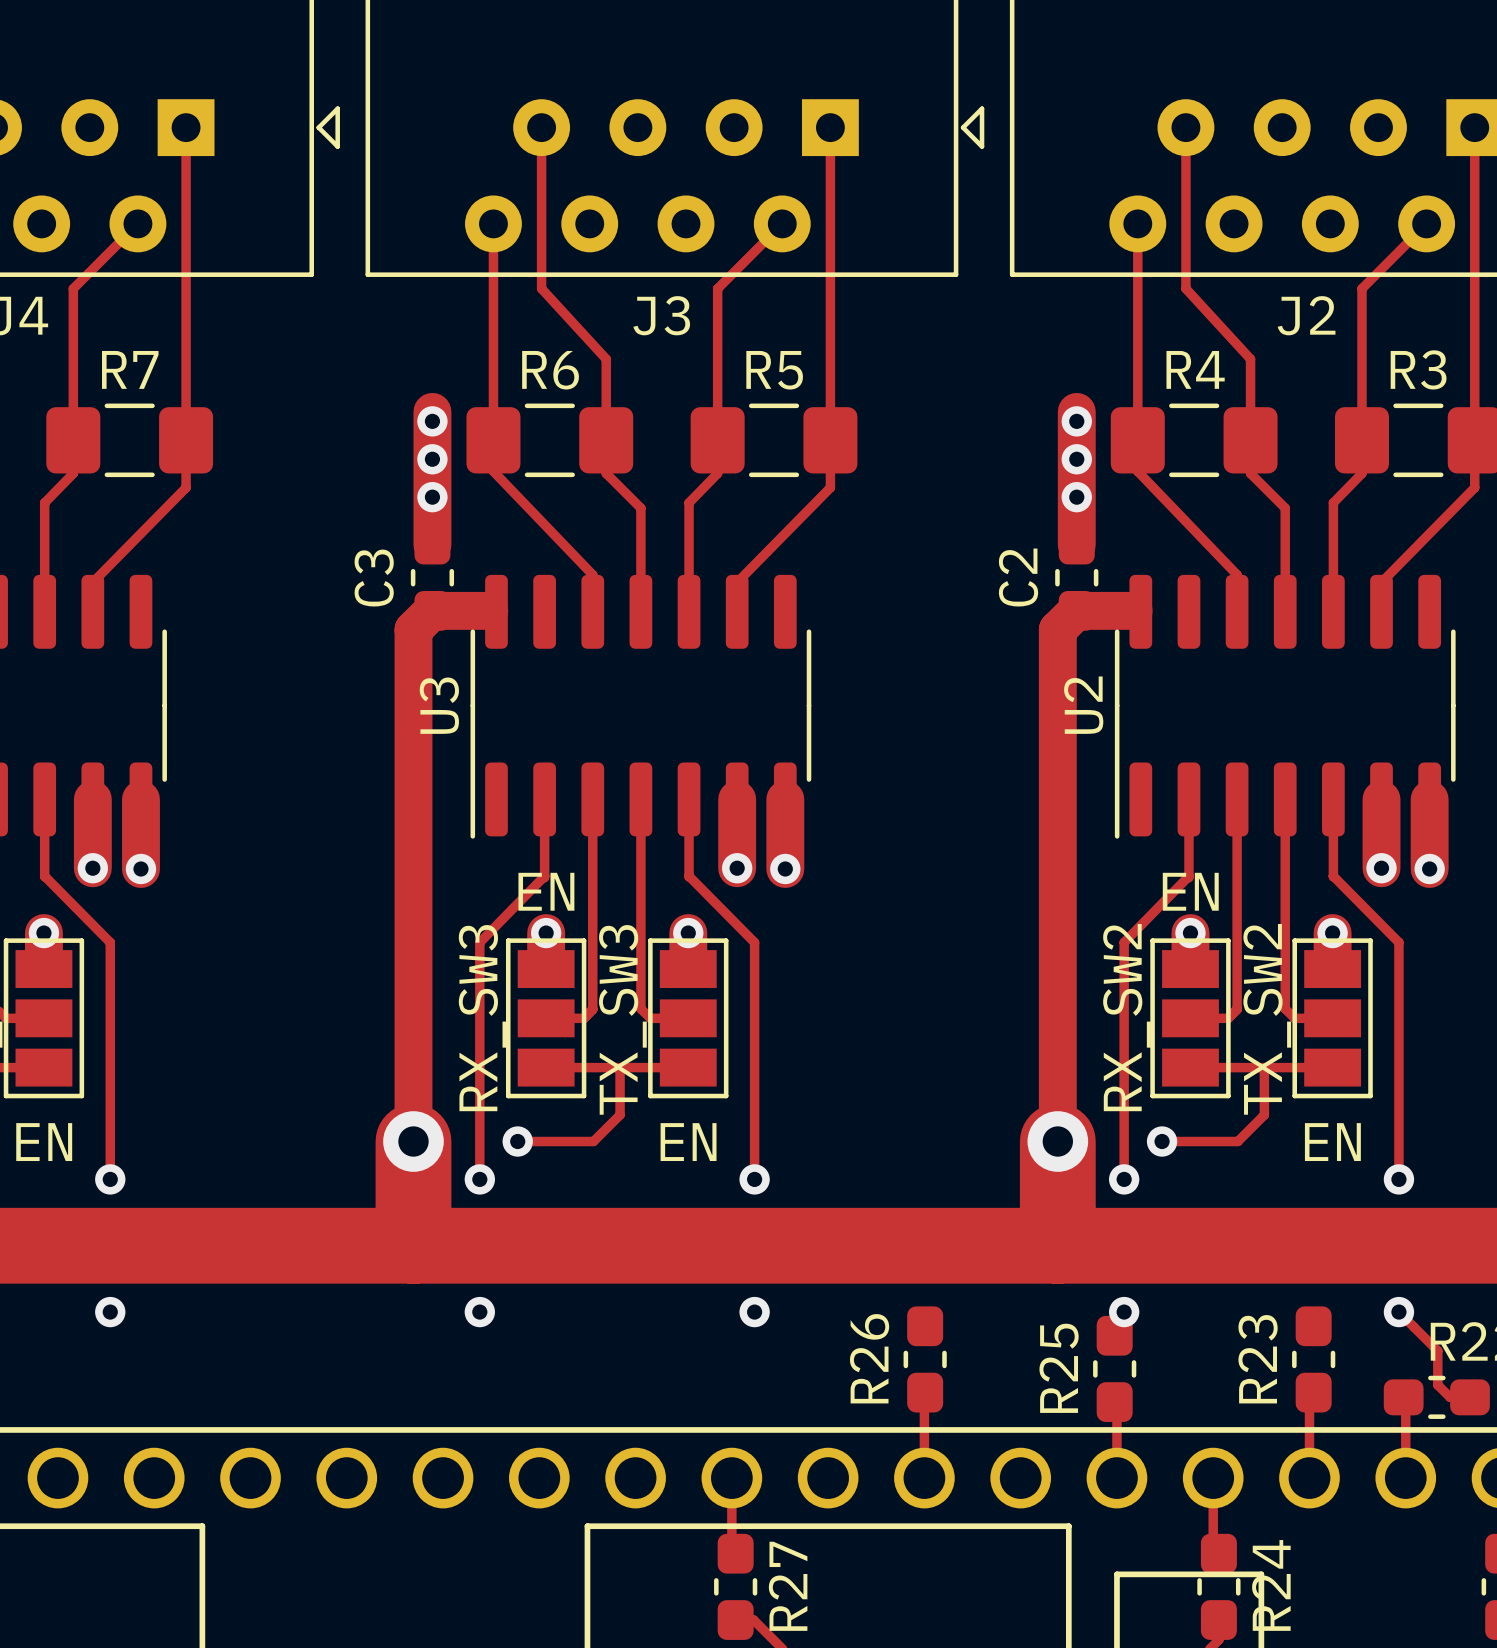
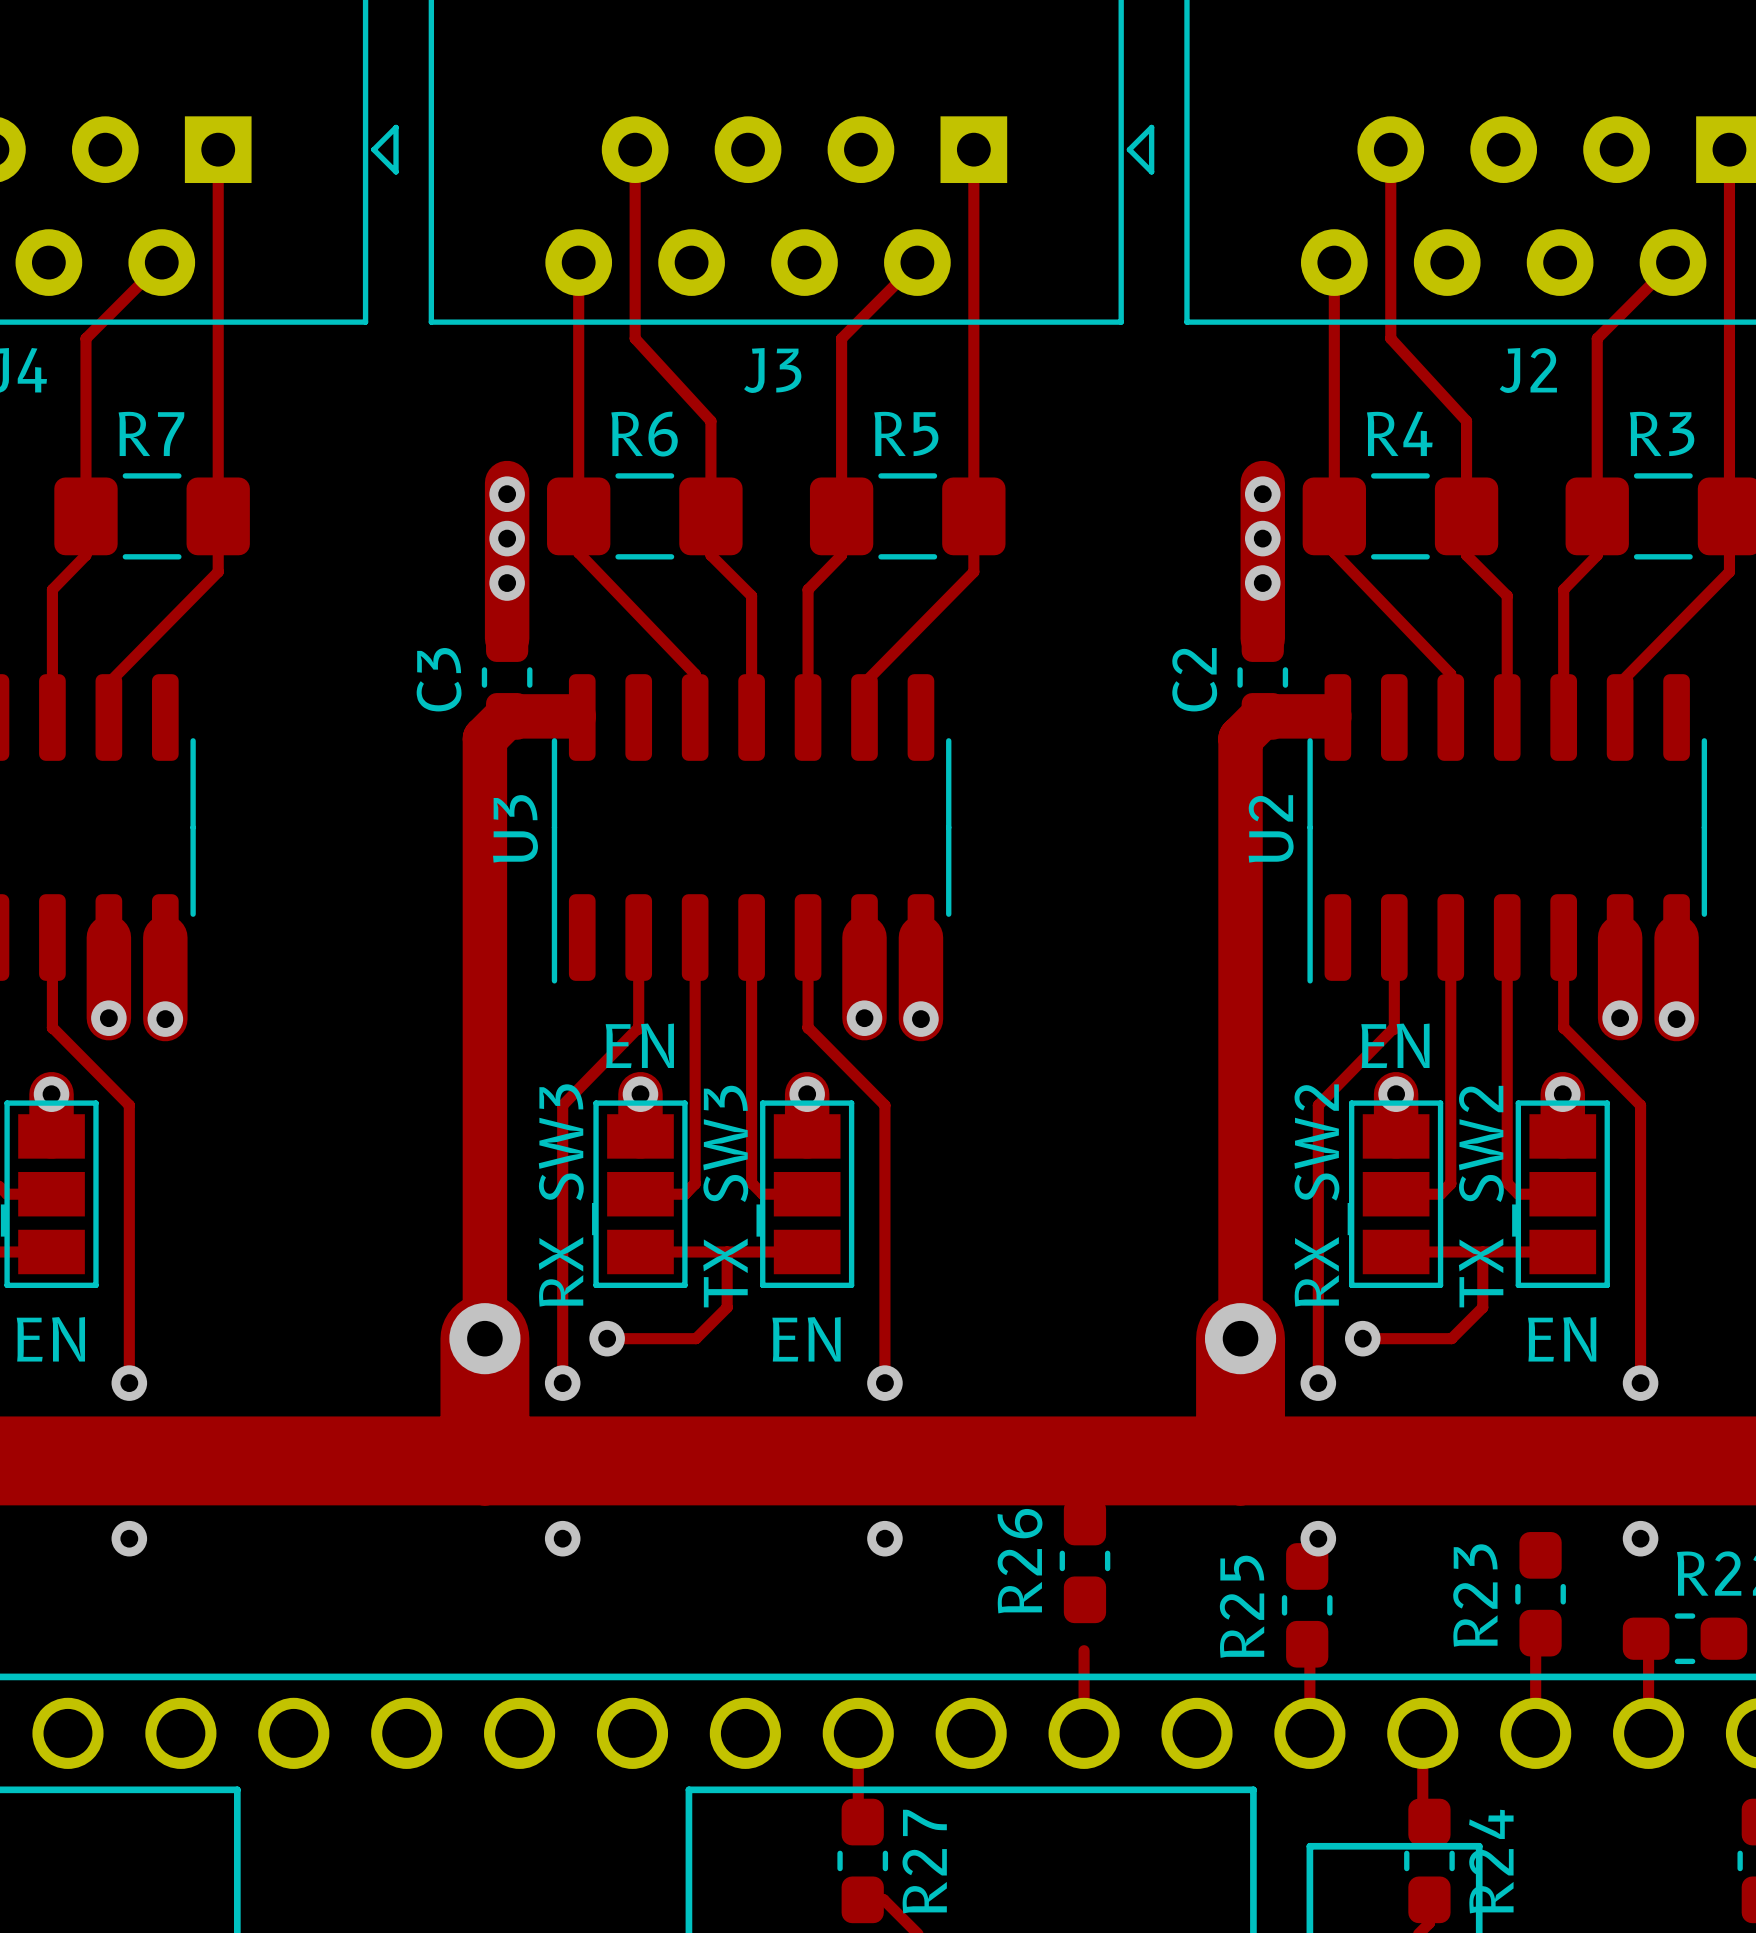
track: (1398, 1312) (1437, 1350) (1437, 1385) (1450, 1397) (1470, 1397) -> none
R26 position: (925, 1359) -> (1084, 1560)

